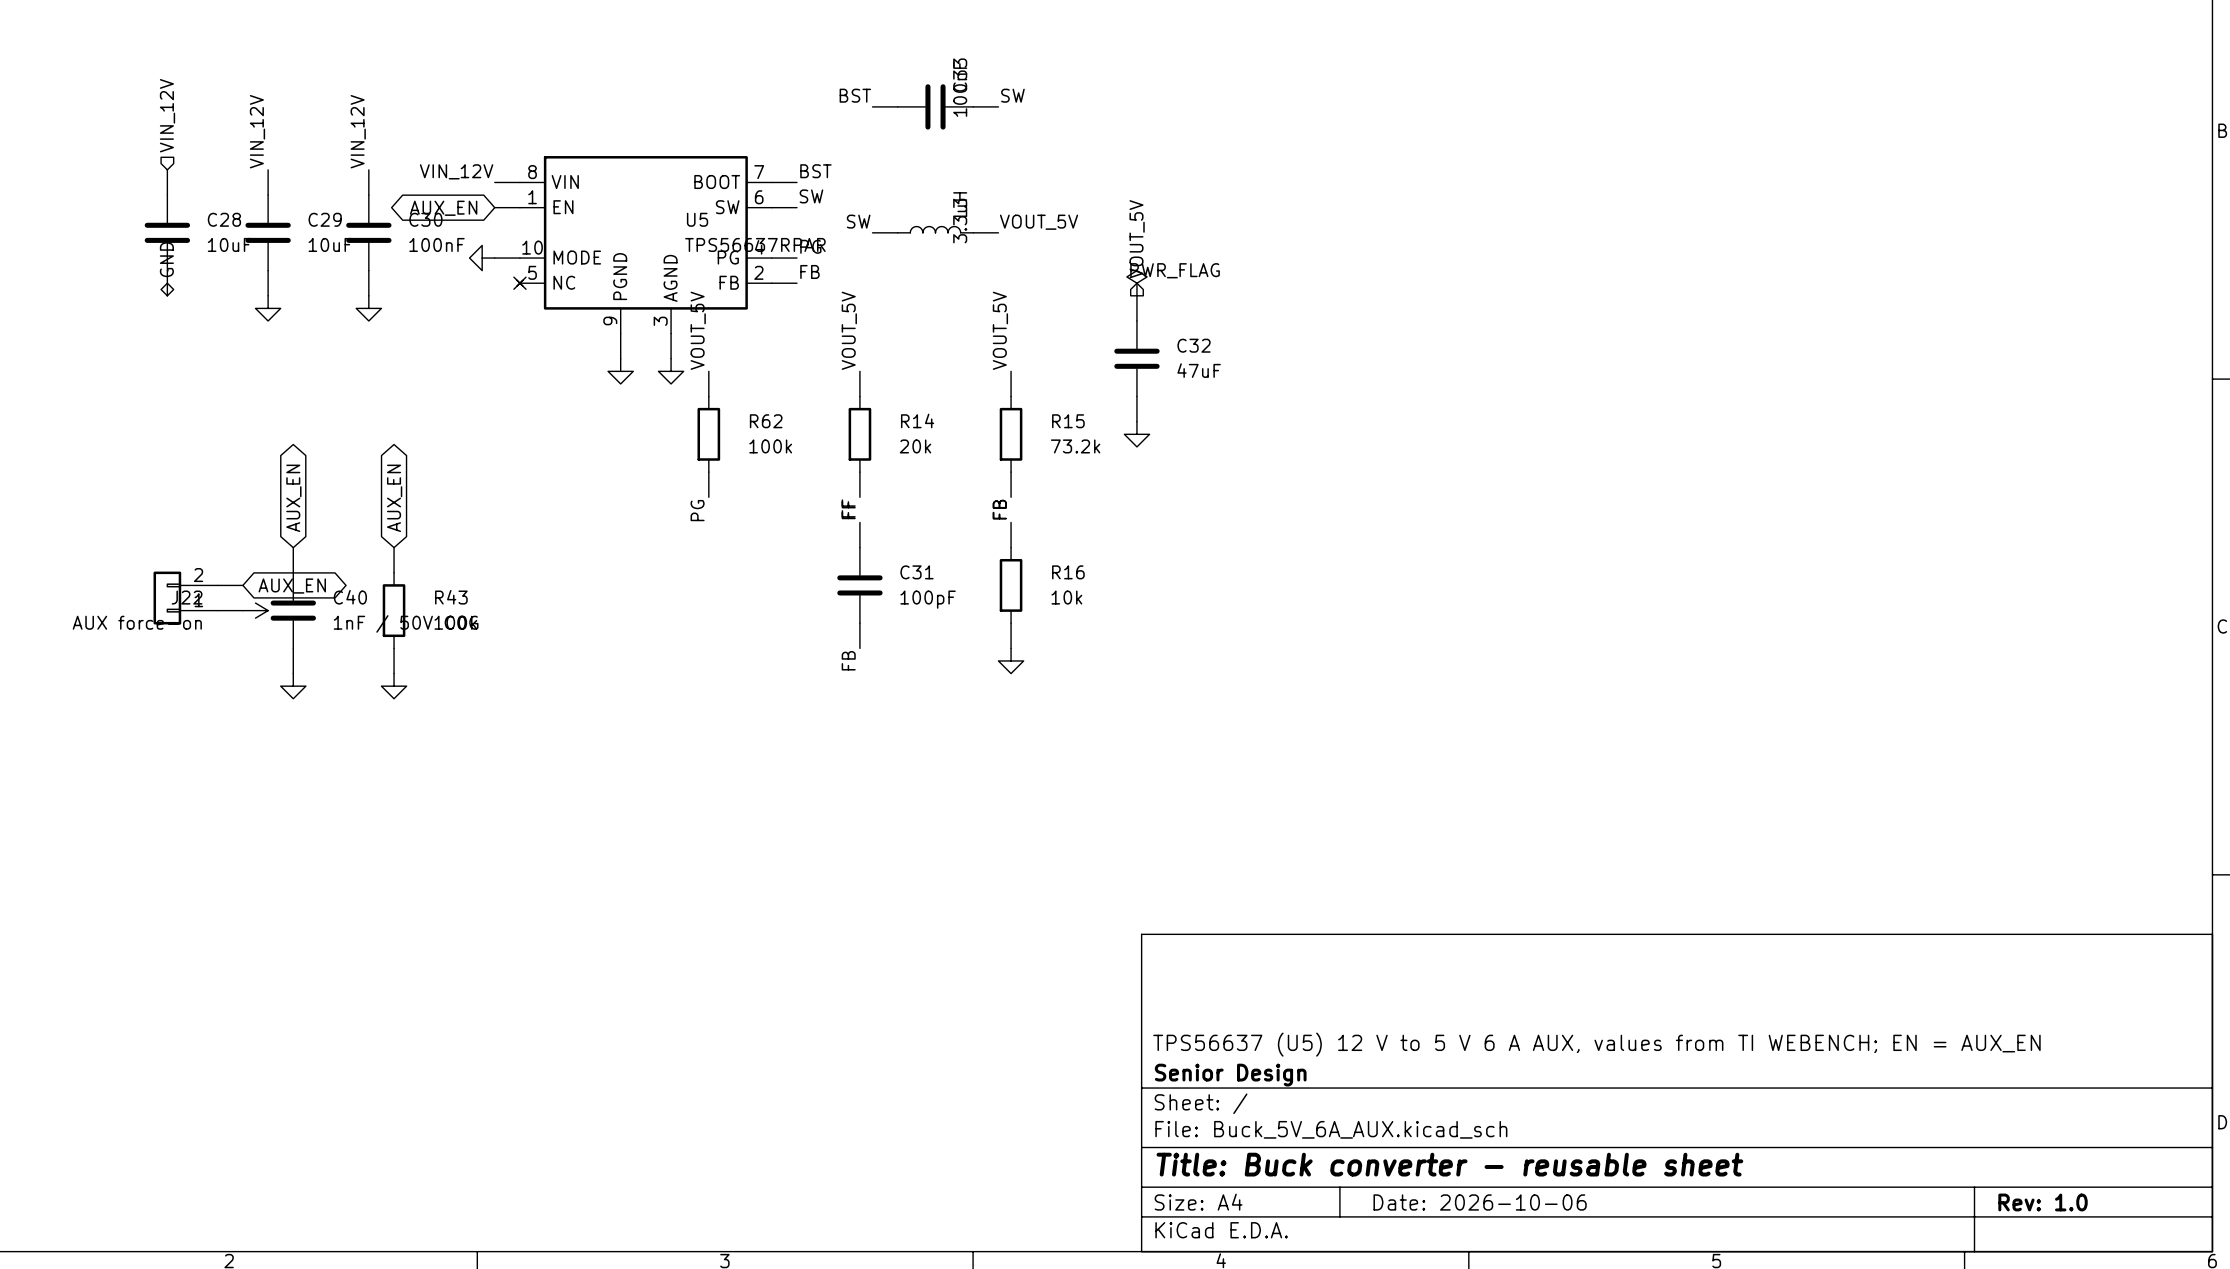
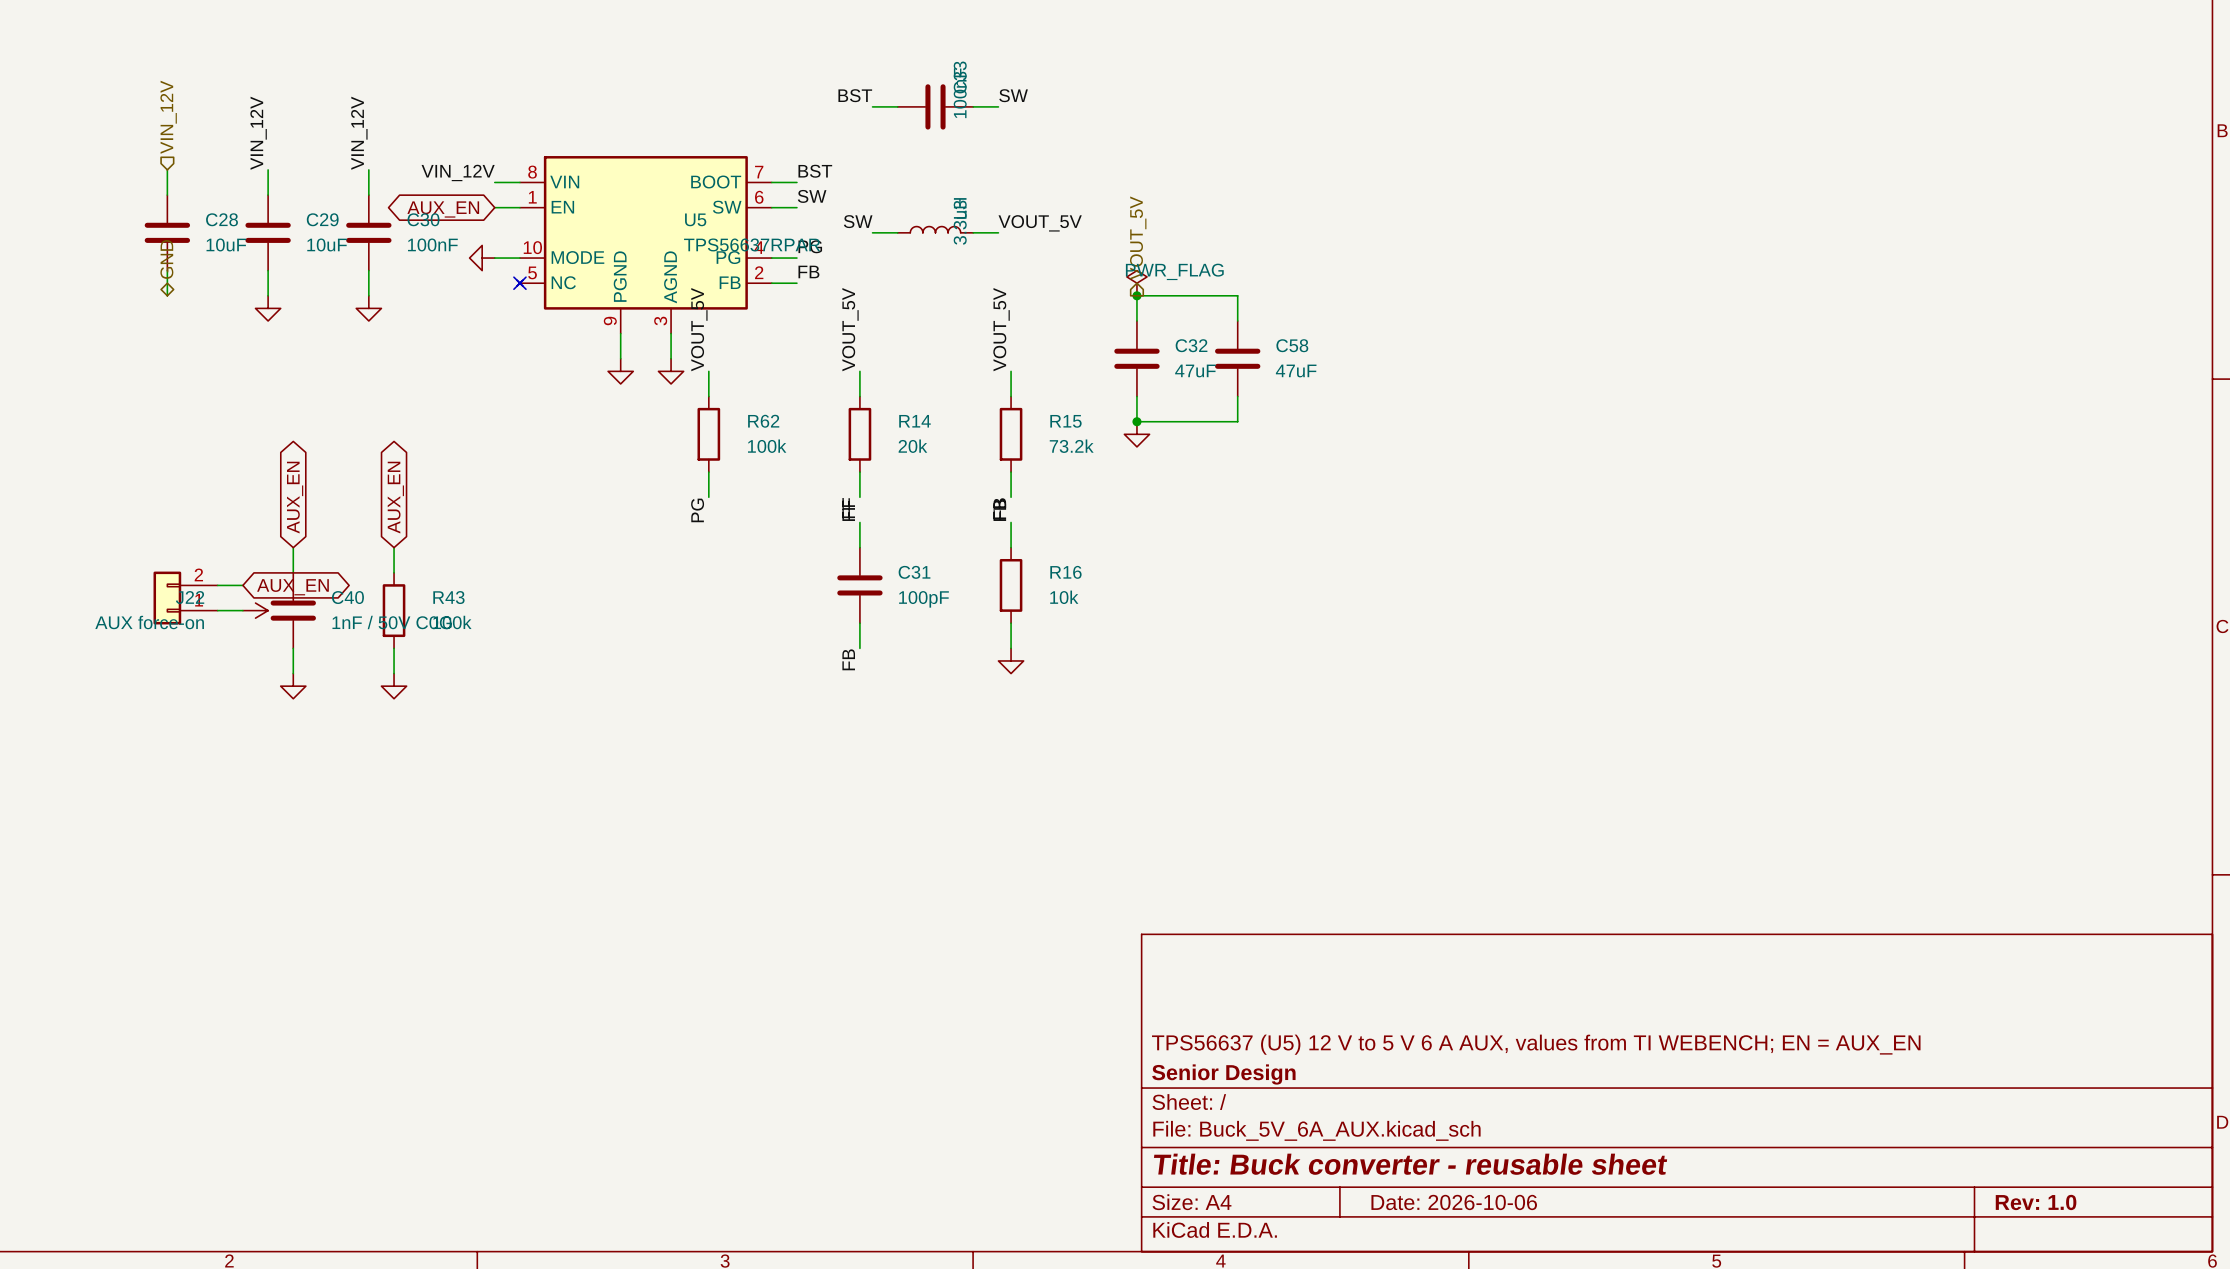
wire: none -> (1136, 295) (1237, 295) (1237, 320)
junction: none -> (1136, 295)
C58: none -> 47uF (1237, 358)
wire: none -> (1237, 396) (1237, 421) (1136, 421)
junction: none -> (1136, 421)

